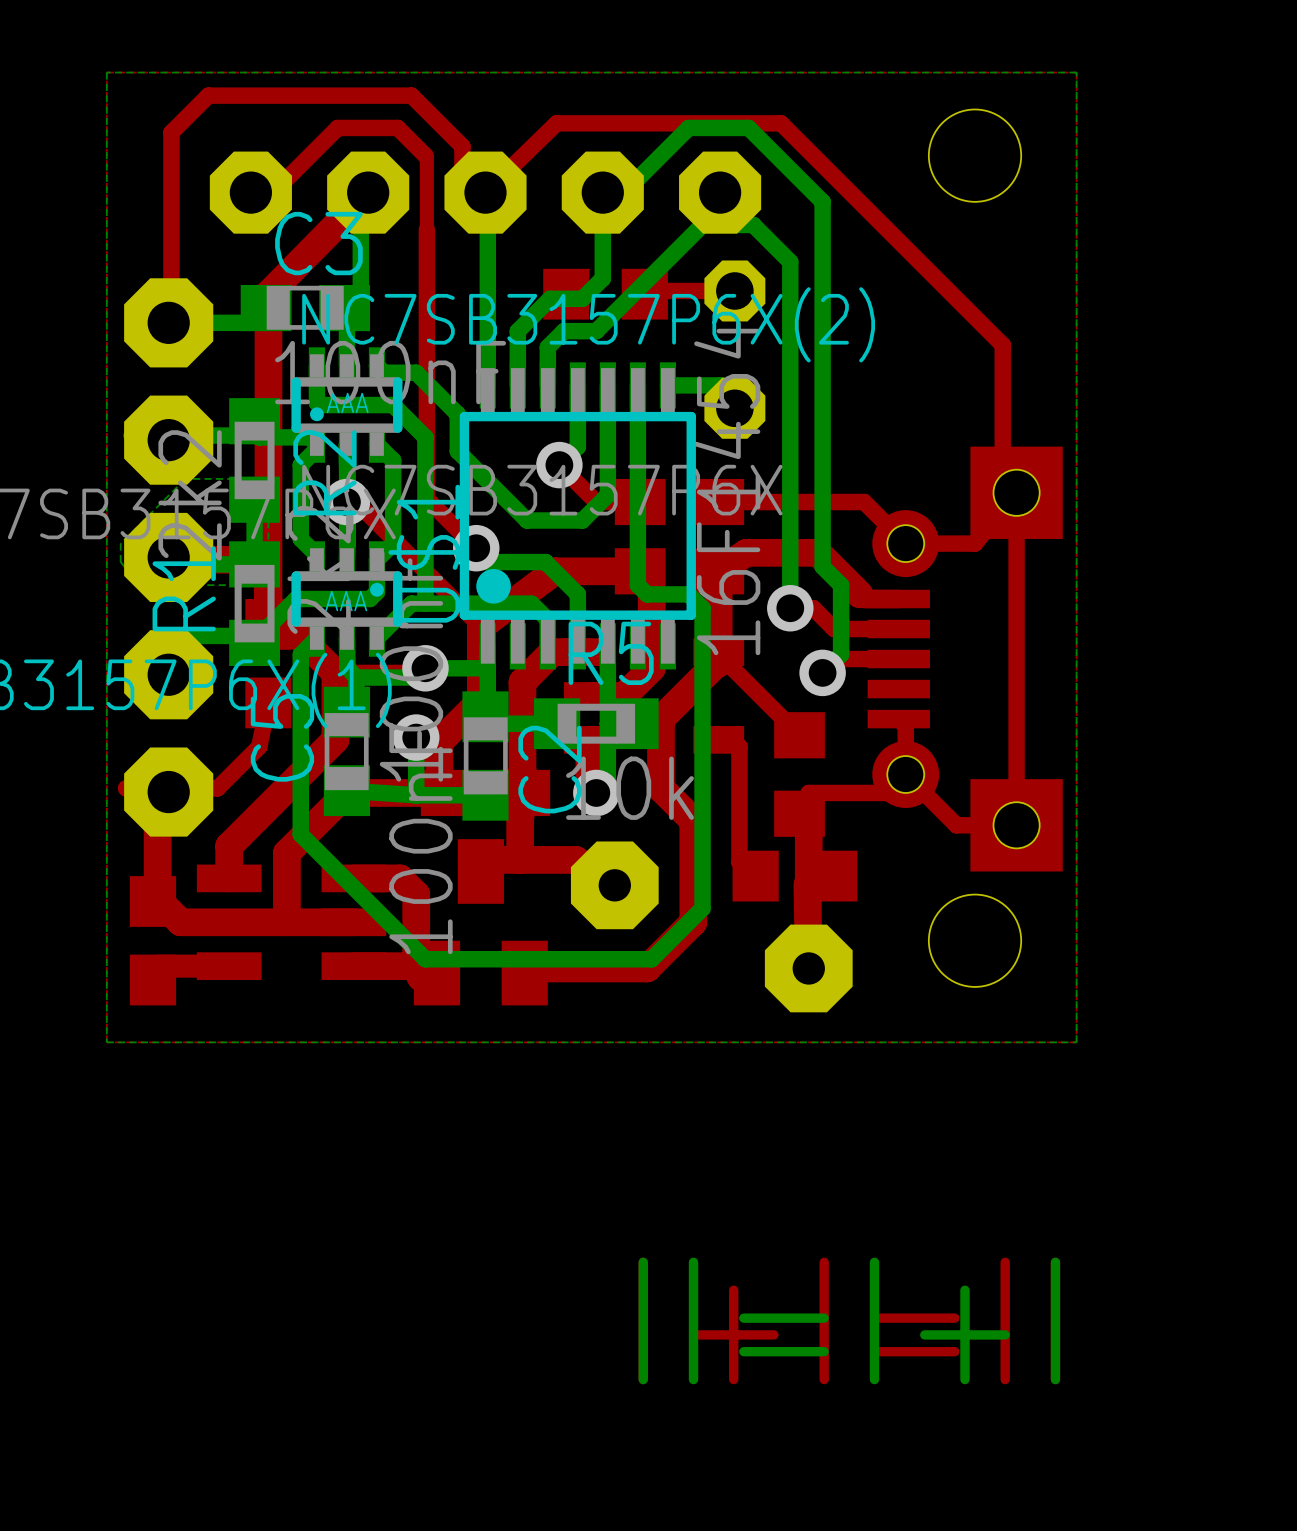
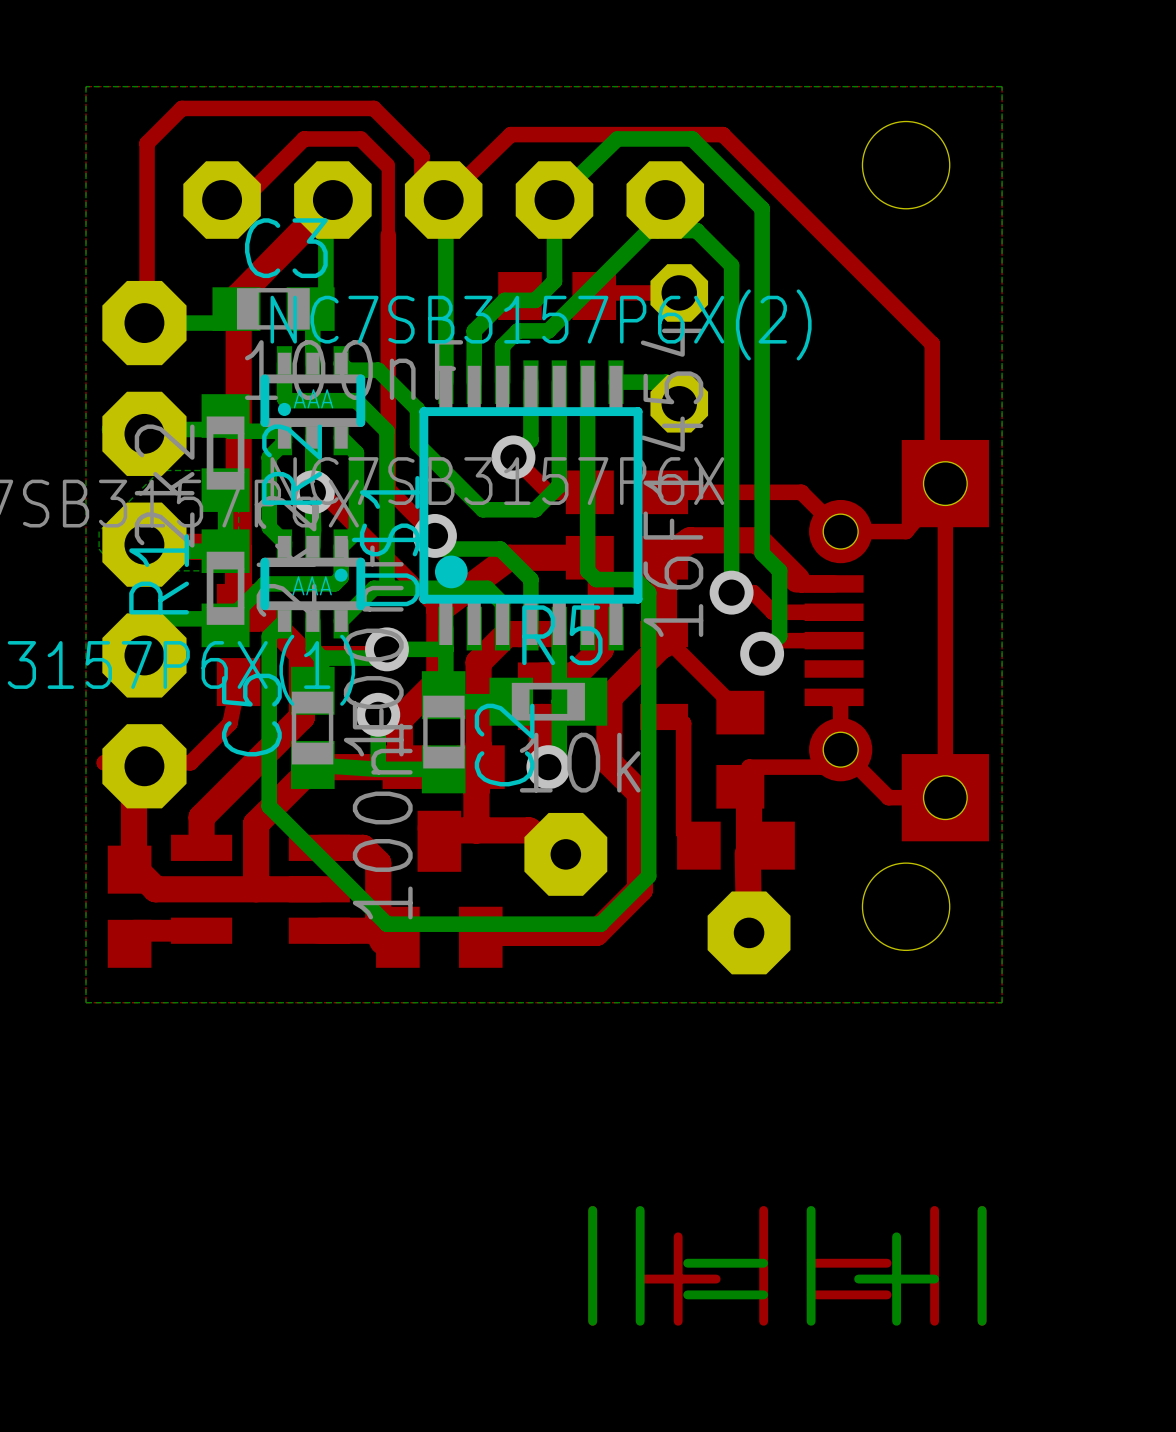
bottom track: (688, 127) (628, 188) (607, 188) (602, 192) -> (635, 138) (617, 138) (554, 200)

